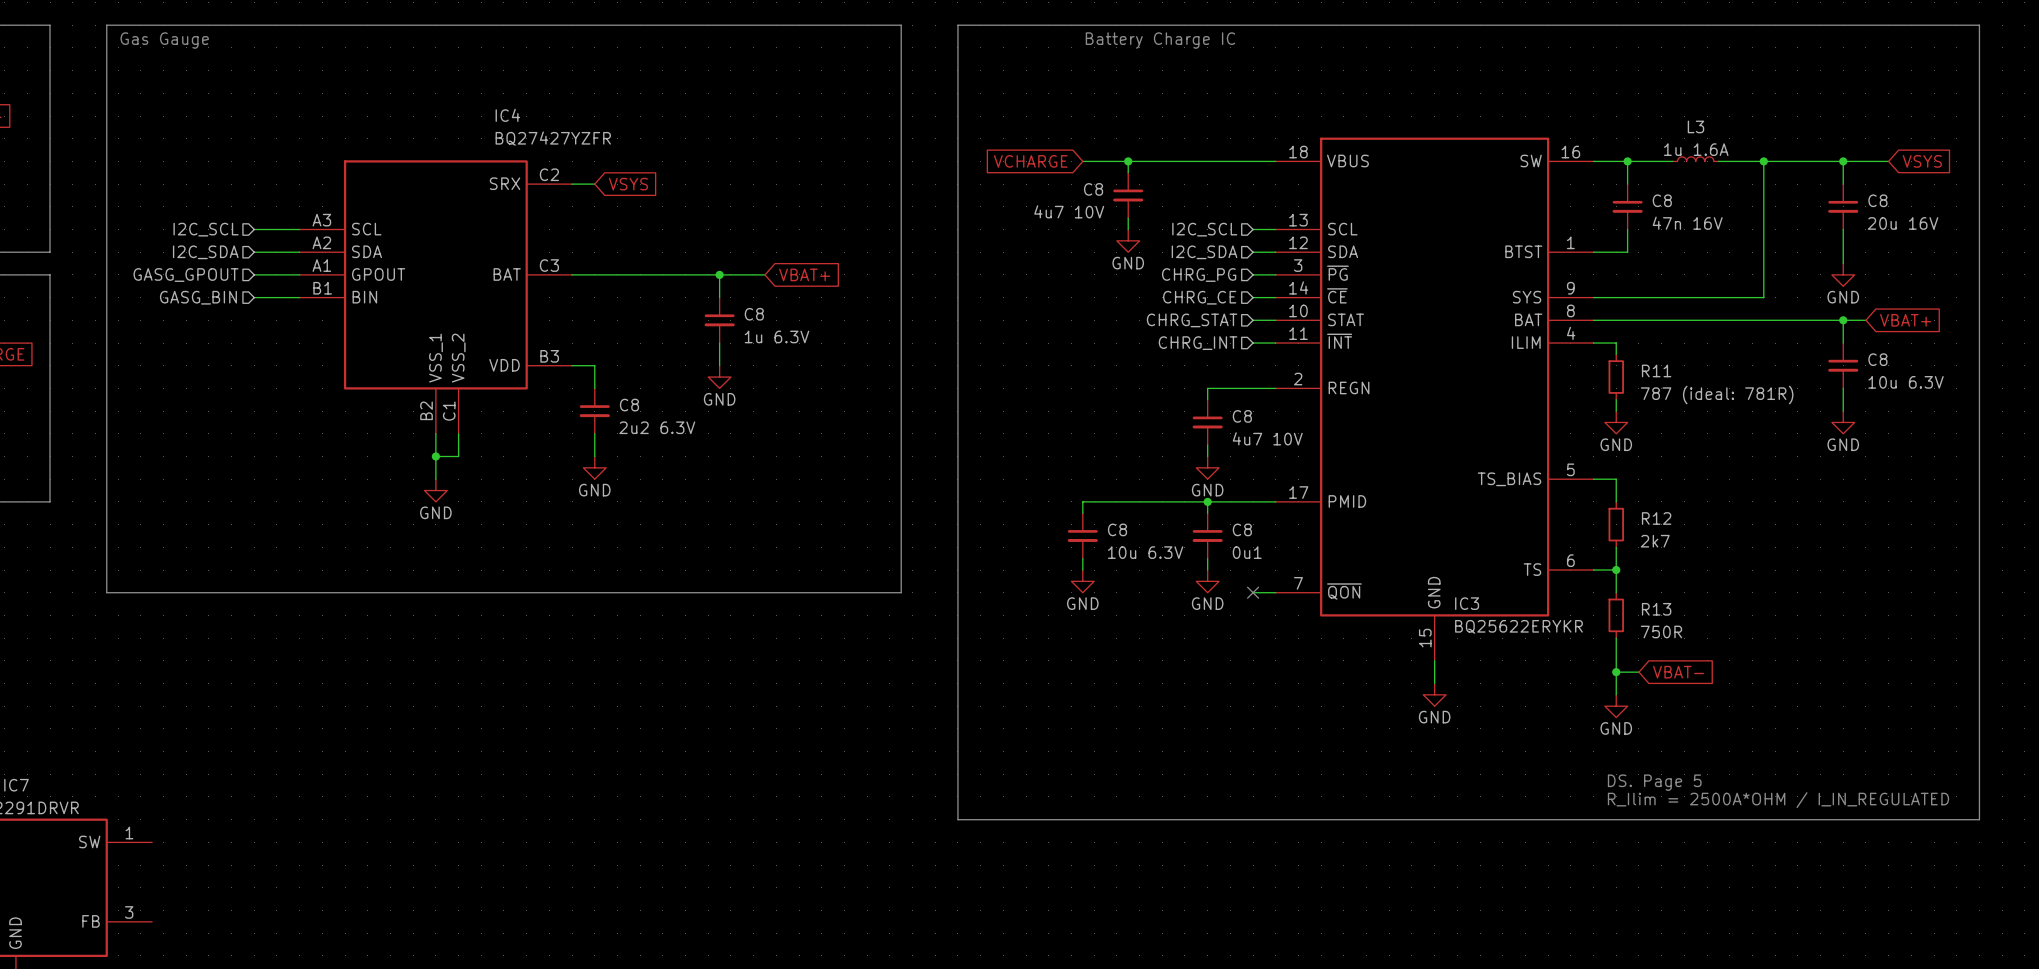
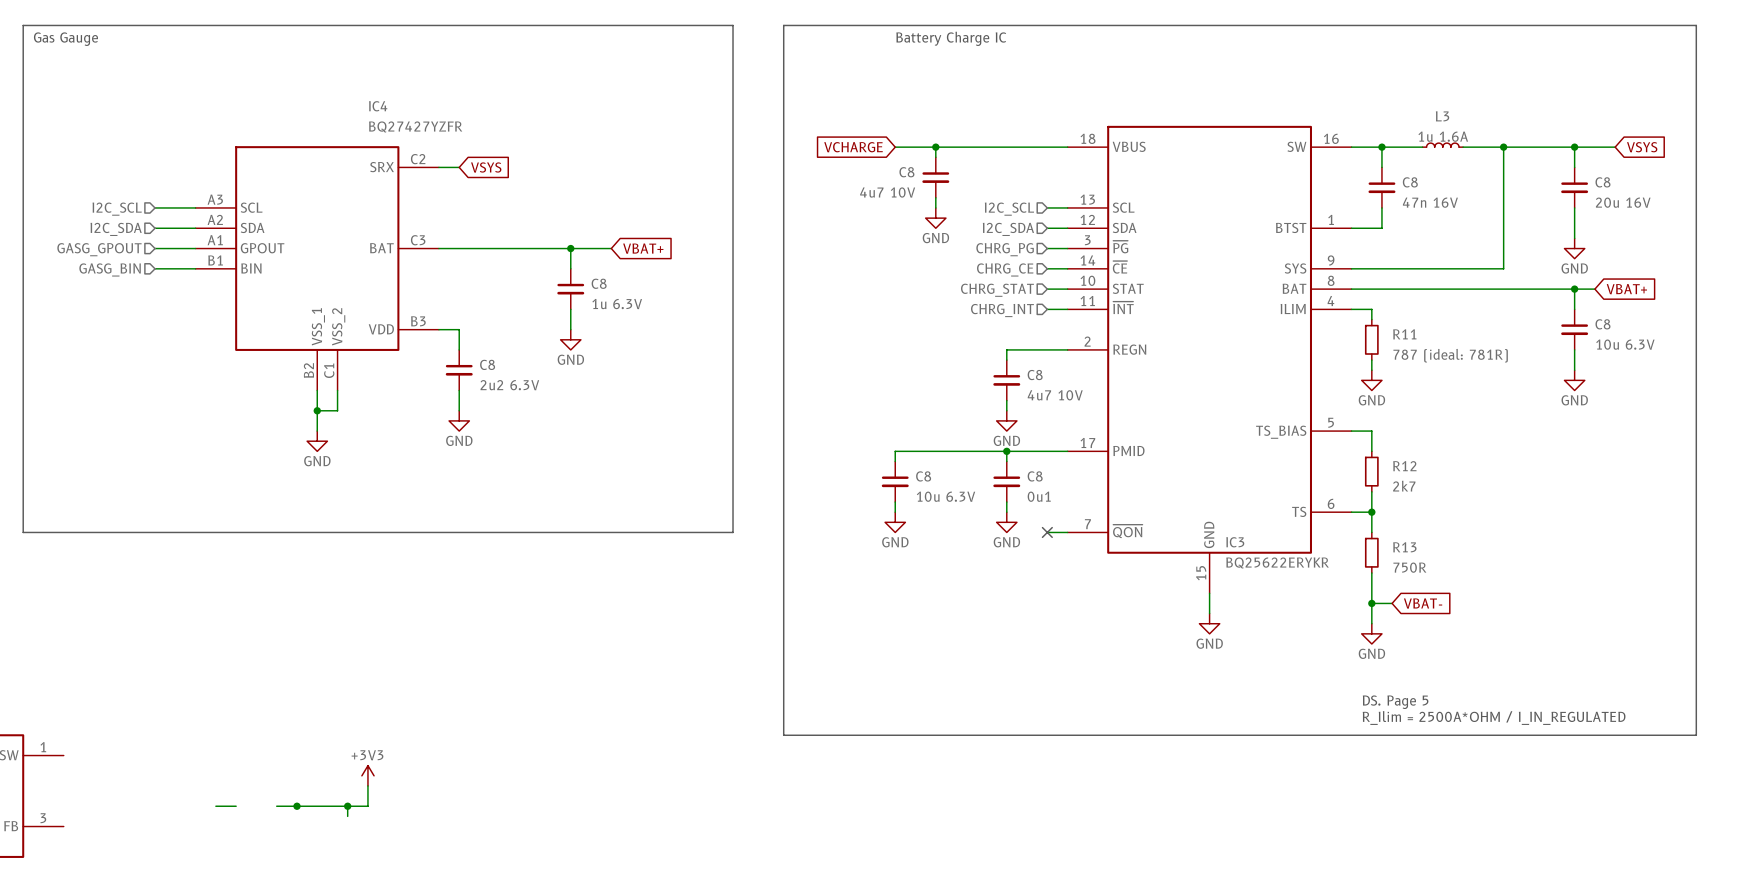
power symbol: none -> +3V3 (367, 775)
wire: none -> (367, 785) (367, 806) (276, 806)
wire: none -> (215, 806) (236, 806)
junction: none -> (296, 806)
wire: none -> (347, 806) (347, 816)
junction: none -> (347, 806)

